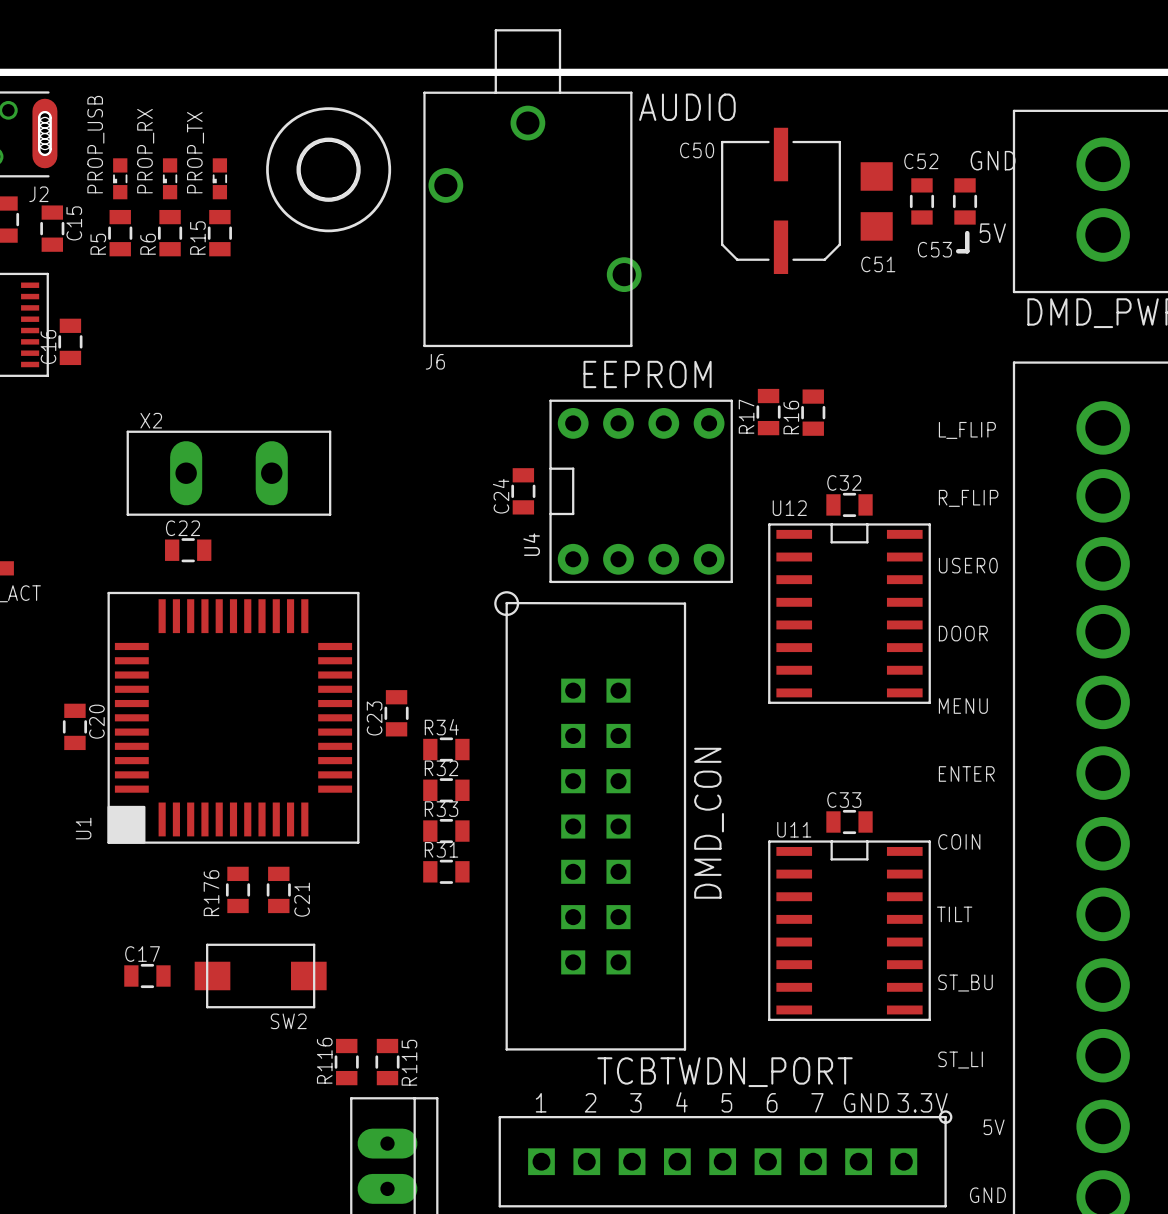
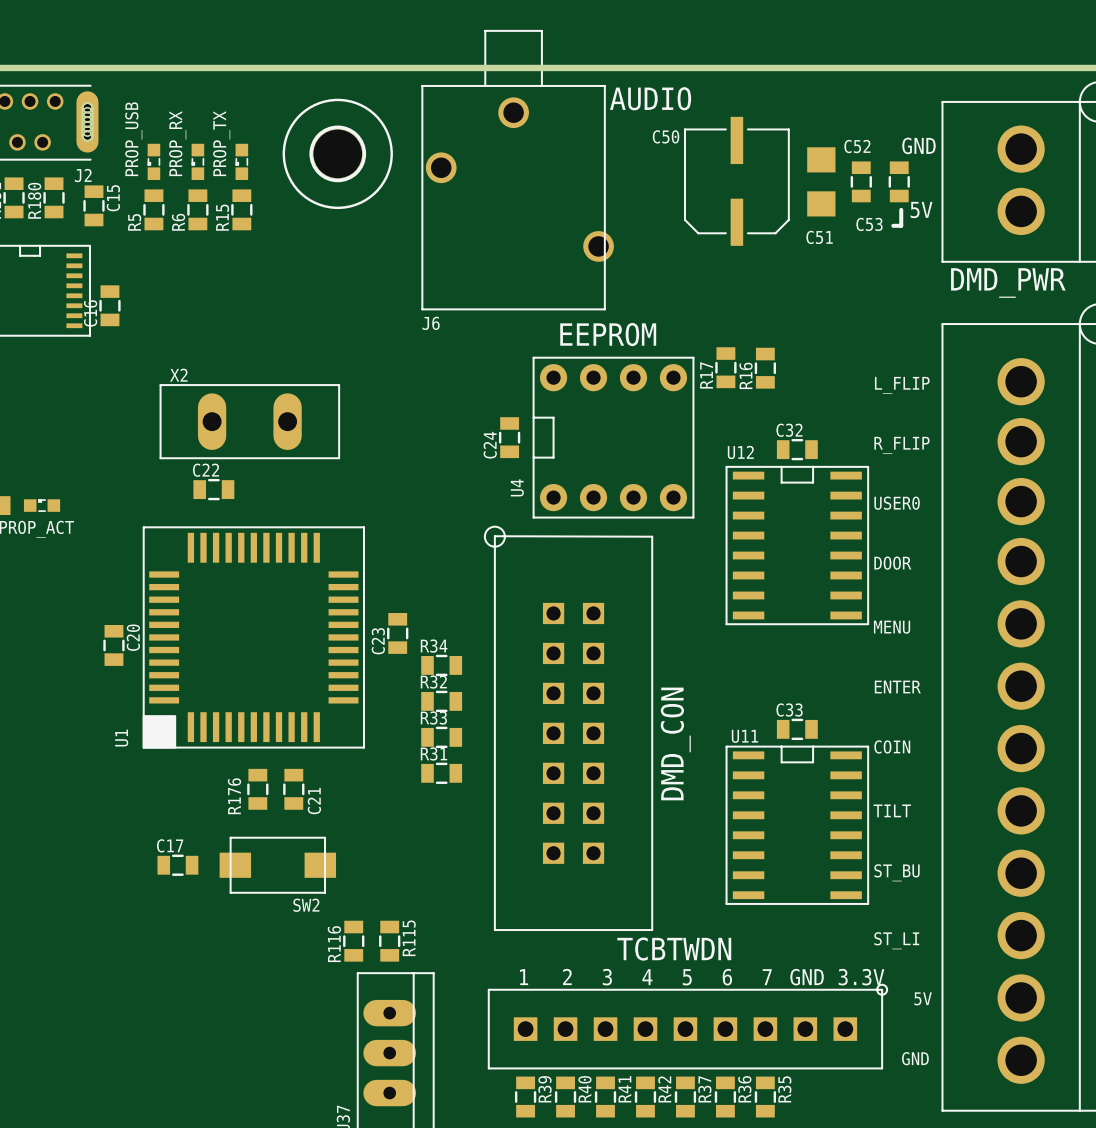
TCBTWDN_PORT name: TCBTWDN_PORT (725, 1072) -> TCBTWDN (674, 949)

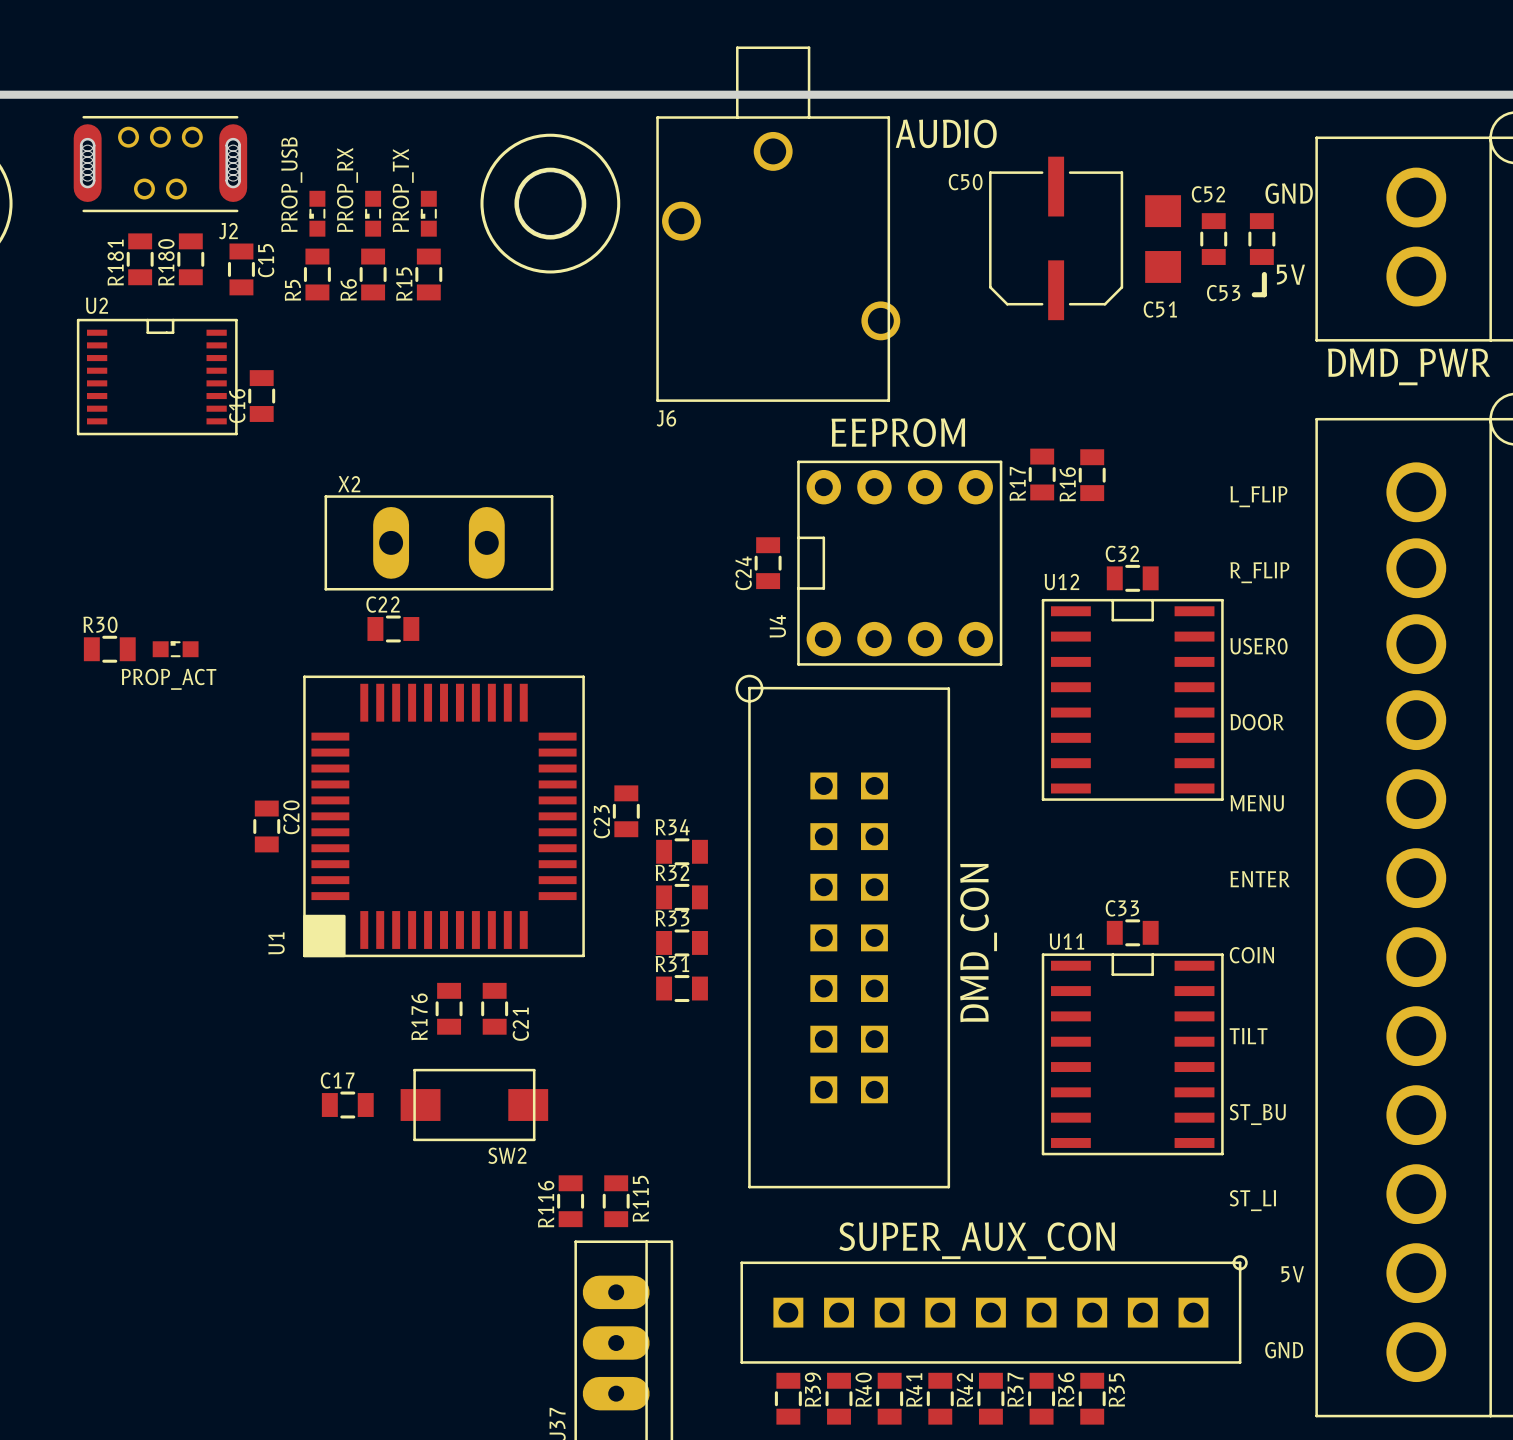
TCBTWDN name: TCBTWDN (674, 949) -> SUPER_AUX_CON (977, 1240)
text: 1 (524, 977) -> none
text: 2 (567, 977) -> none
text: 3 (607, 977) -> none
text: 4 (647, 977) -> none
text: 5 (687, 977) -> none
text: 6 (727, 977) -> none
text: 7 (767, 977) -> none
text: GND (807, 977) -> none
text: 3.3V (861, 977) -> none

